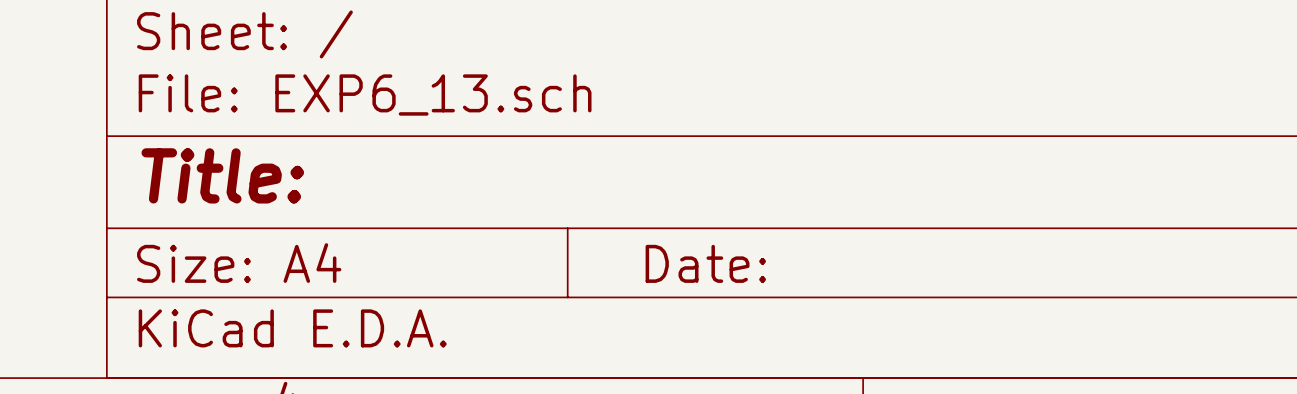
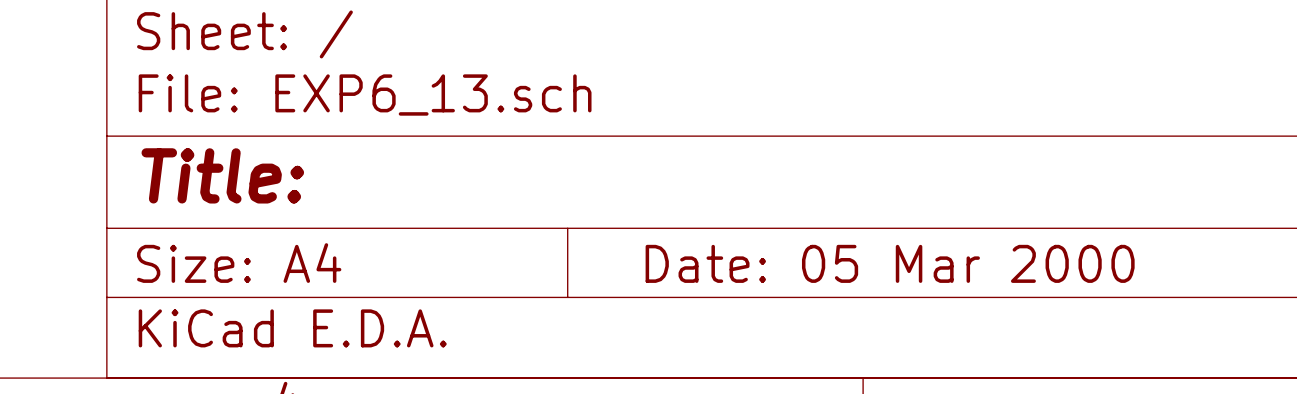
title block: Date: (705, 263) -> Date: 05 Mar 2000 (890, 263)

